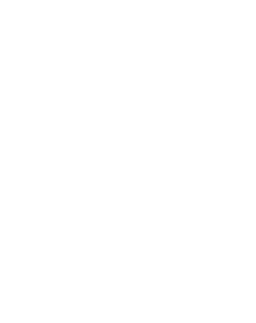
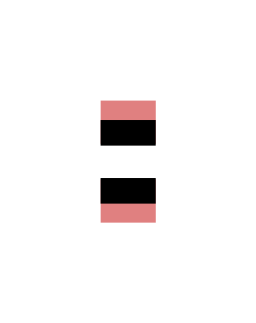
part: none -> (128, 161)

